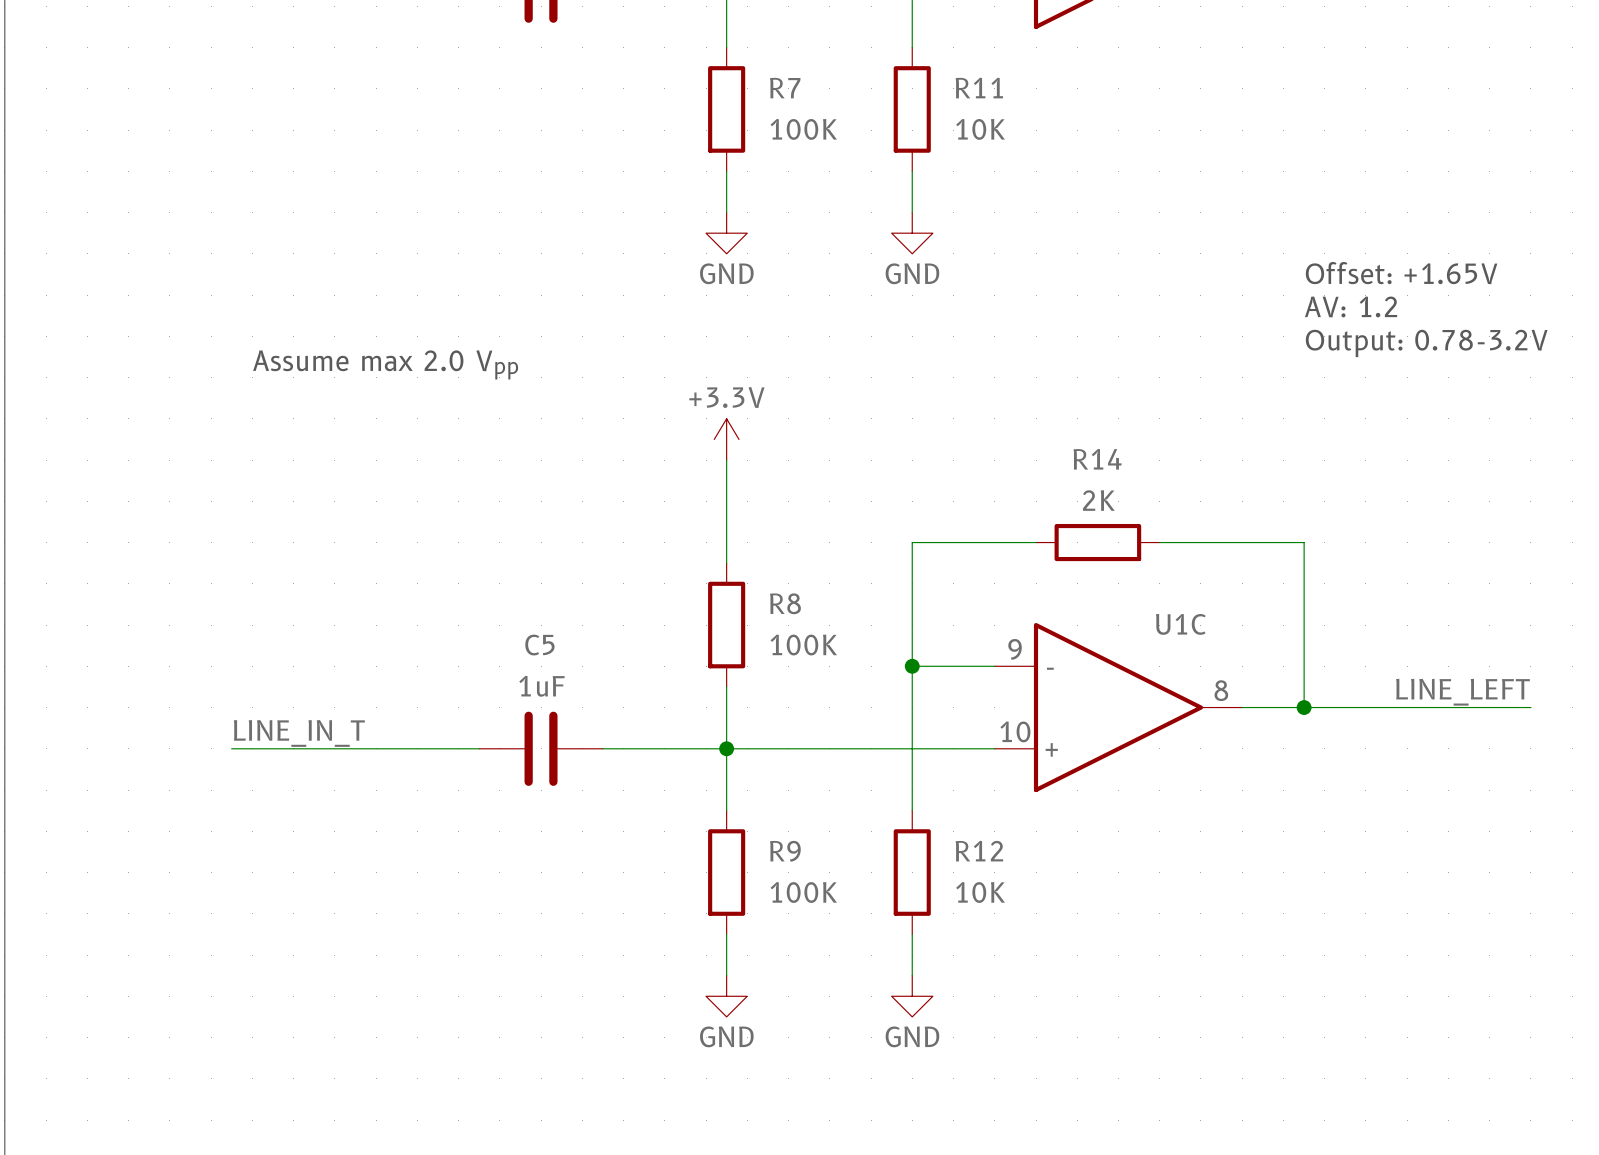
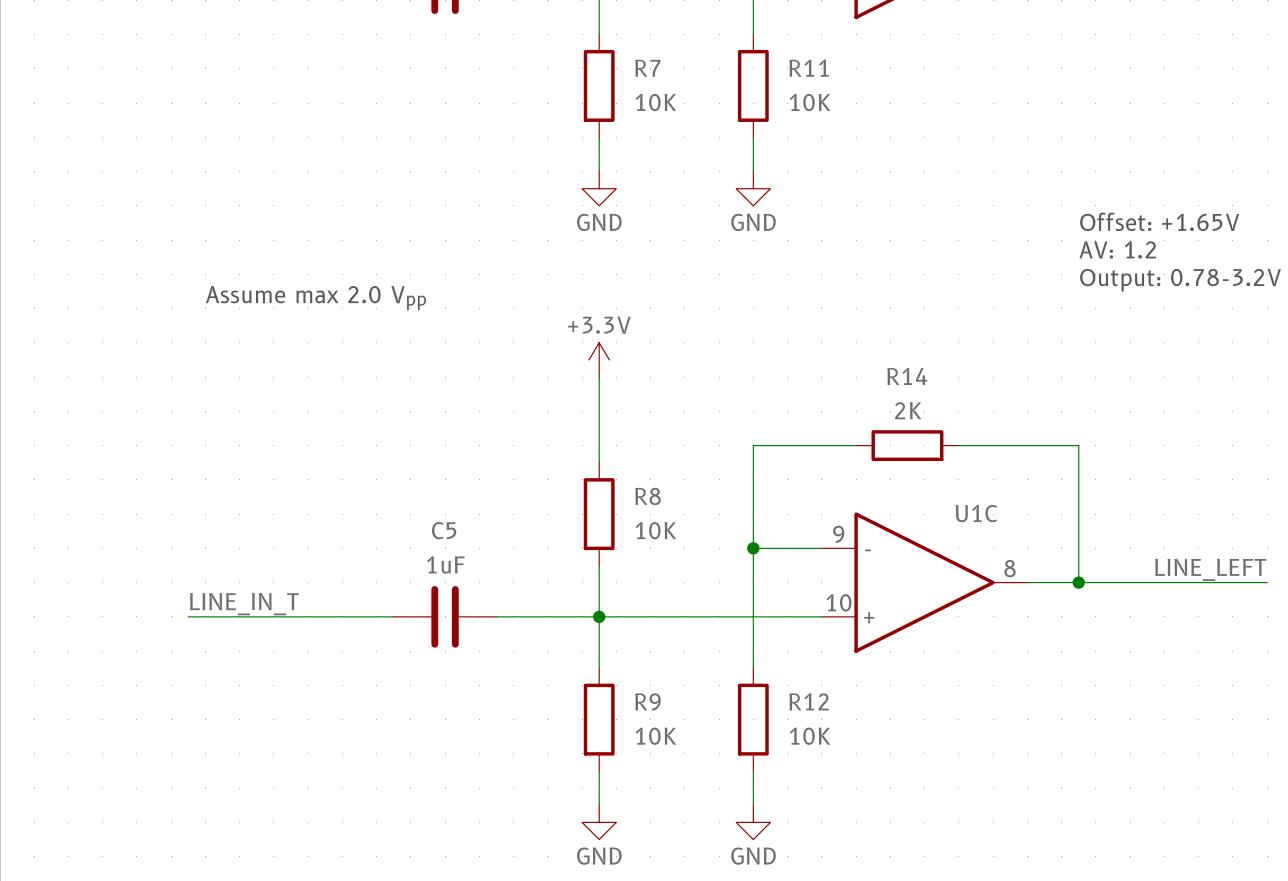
R7 value: 100K (803, 129) -> 10K (655, 102)
R8 value: 100K (803, 645) -> 10K (655, 530)
R9 value: 100K (803, 892) -> 10K (655, 736)

